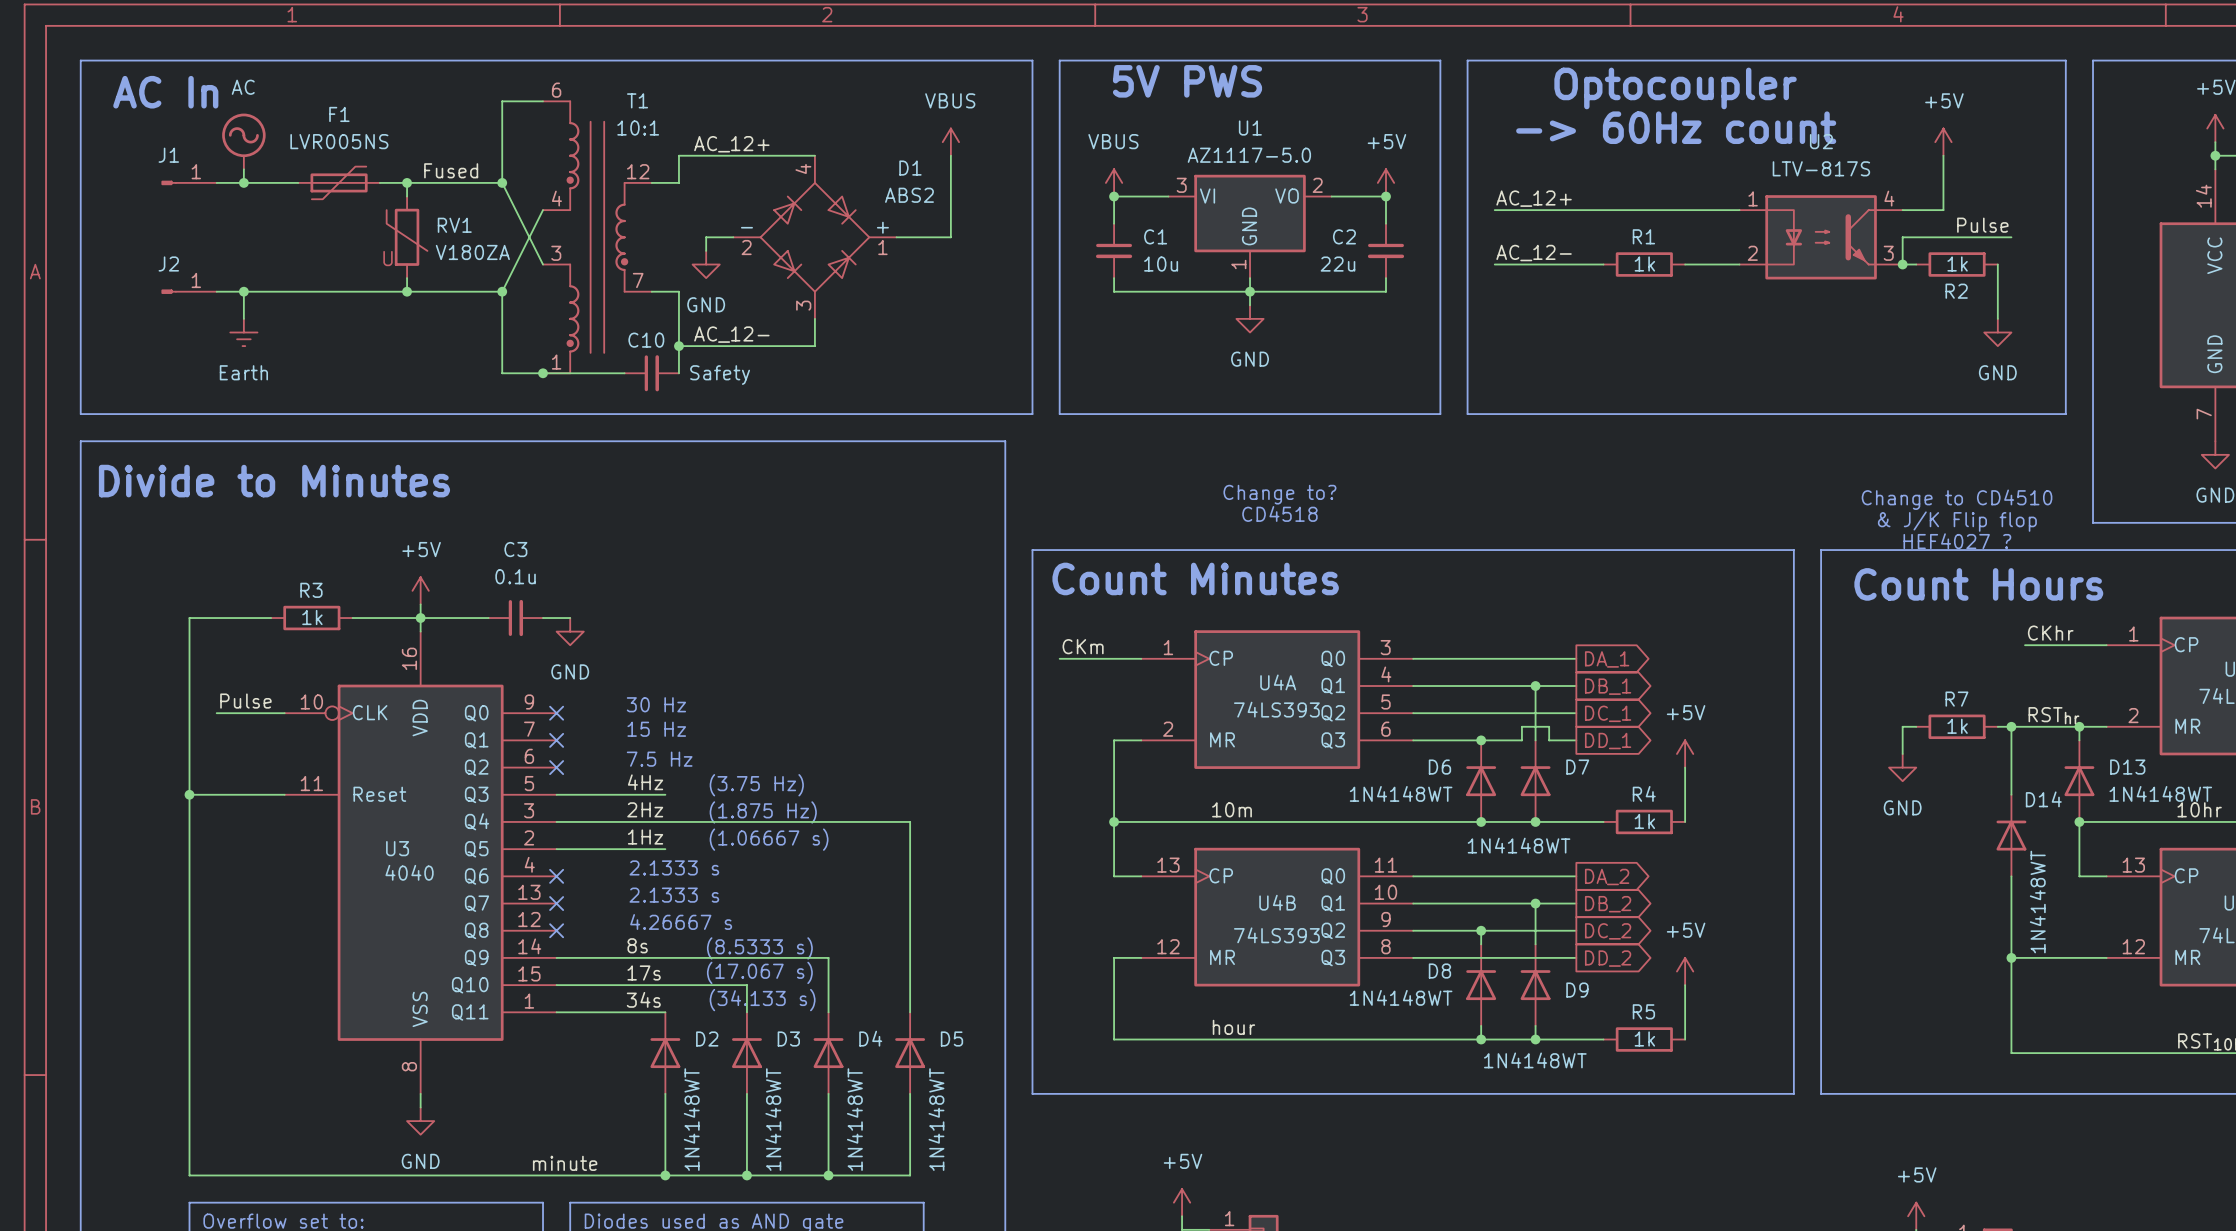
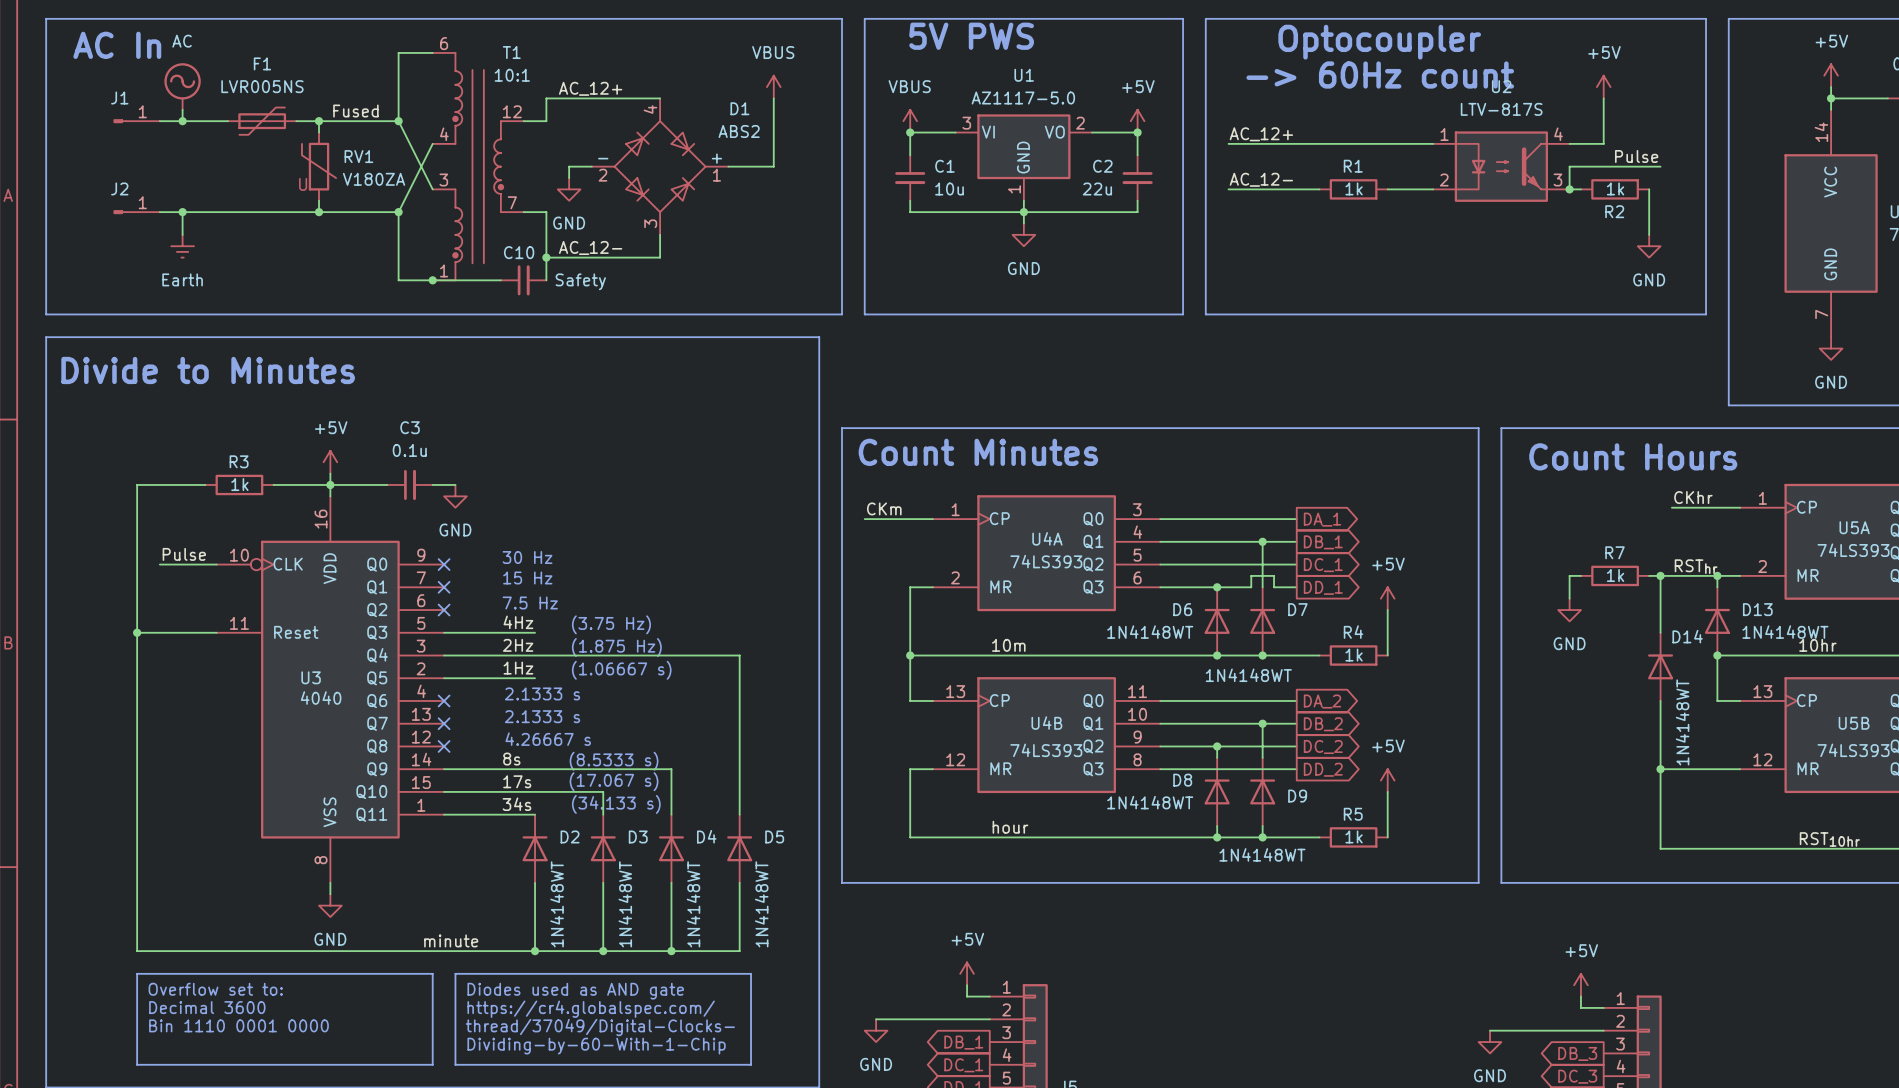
text: Change to? (1279, 494) -> none
text: Change to CD4510 (1957, 499) -> none
text: CD4518 (1279, 513) -> none
text: & J/K Flip flop (1957, 521) -> none
text: HEF4027 ? (1957, 541) -> none

